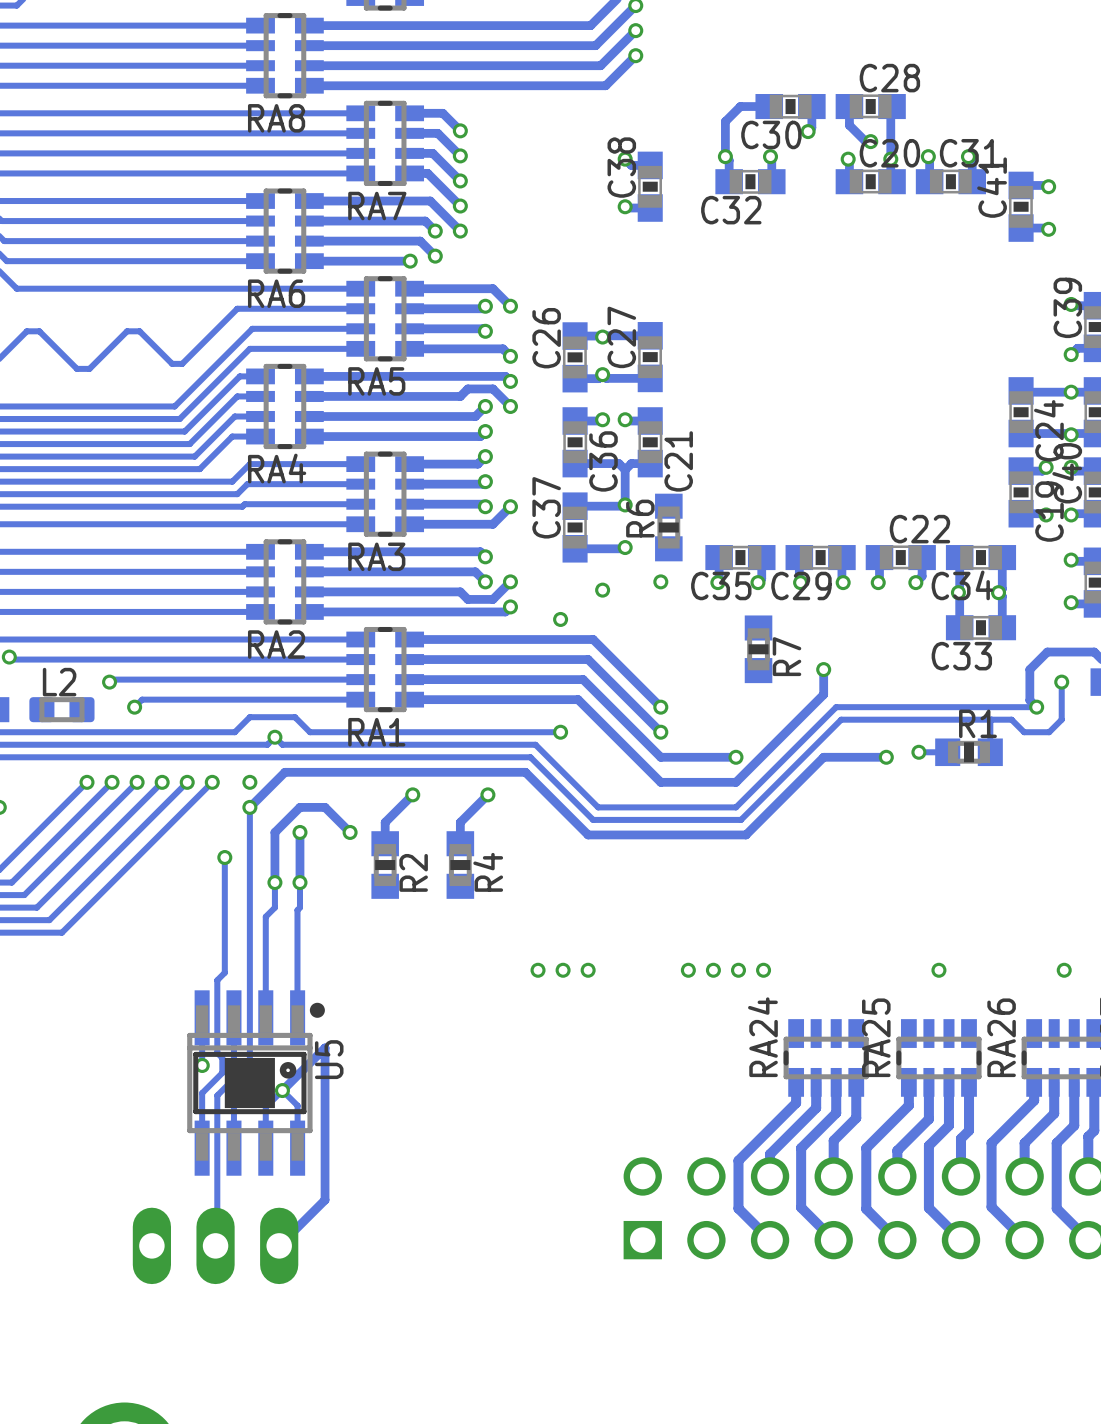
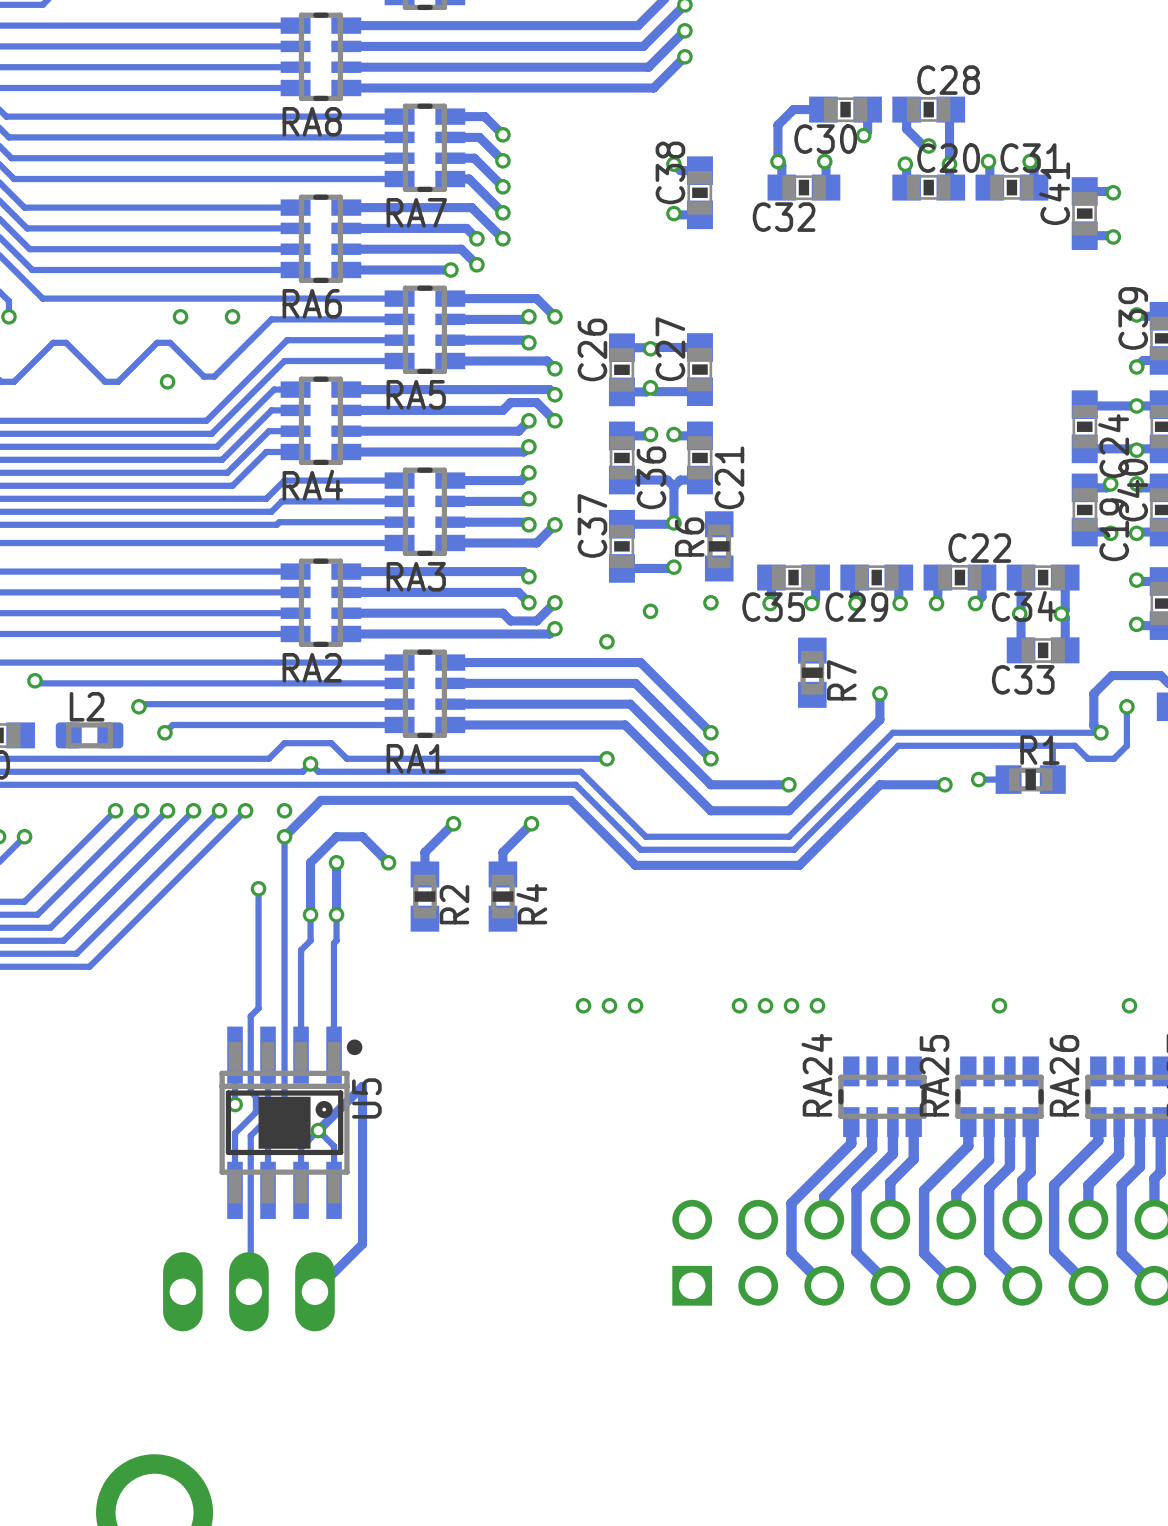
via: none -> (180, 316)
via: none -> (232, 316)
via: none -> (167, 381)

